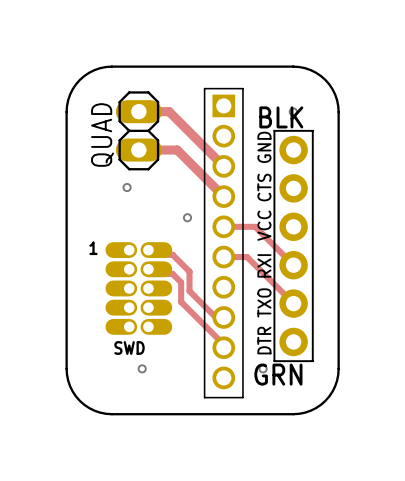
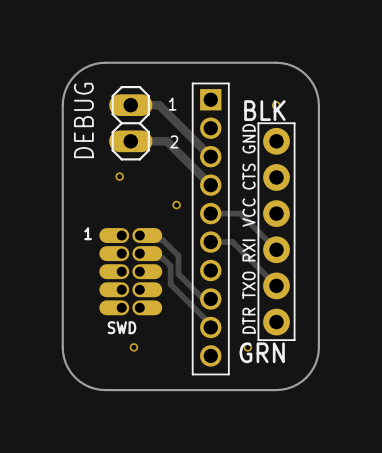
text: none -> 1 (172, 104)
QUAD name: QUAD (102, 134) -> DEBUG (83, 120)
text: none -> 2 (174, 141)

